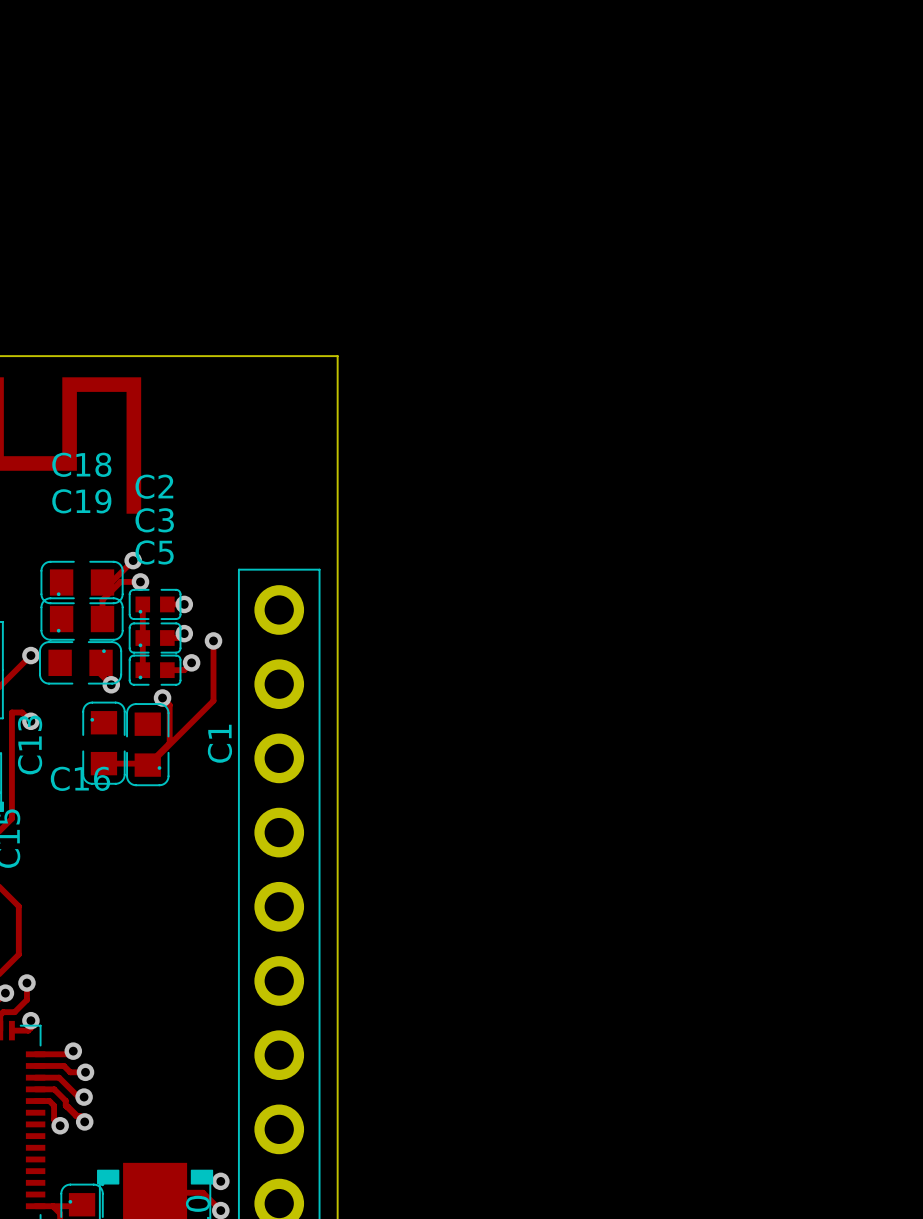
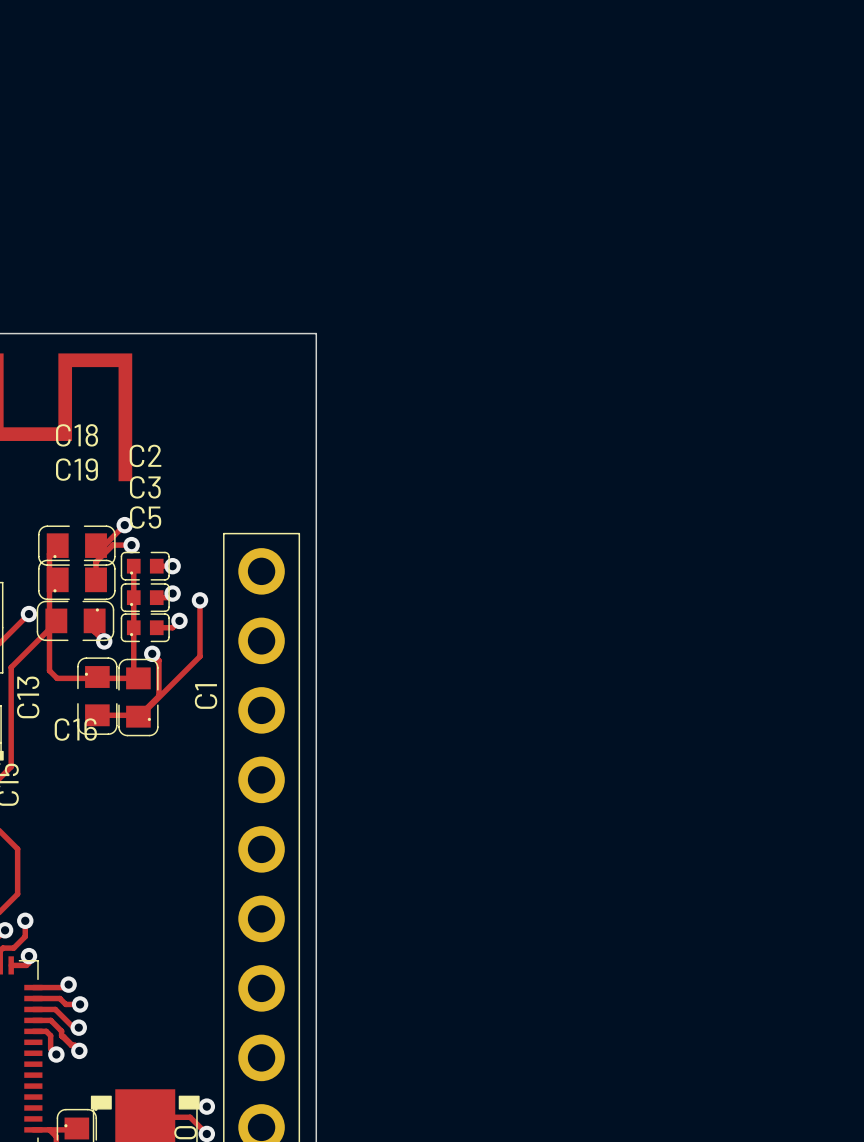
track: none -> (49, 553) (49, 670) (57, 678) (138, 678)
track: none -> (133, 627) (133, 673)
track: (11, 712) (22, 712) (30, 721) -> (11, 667) (56, 622)
via: (30, 721) -> none

